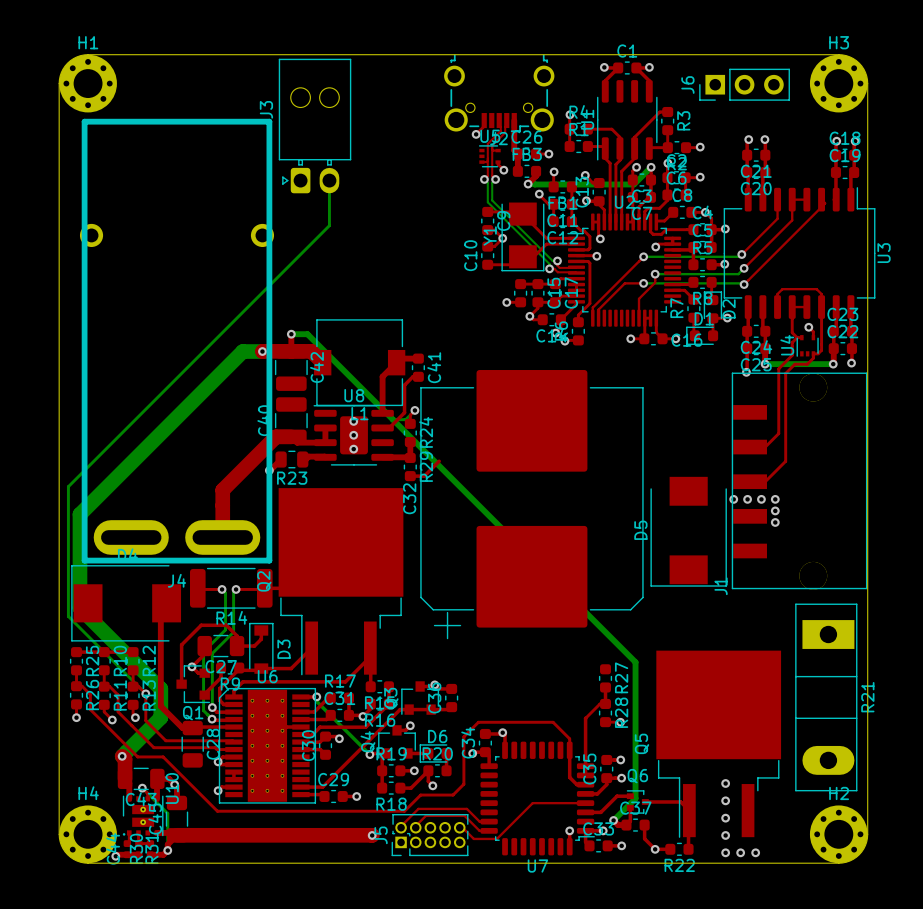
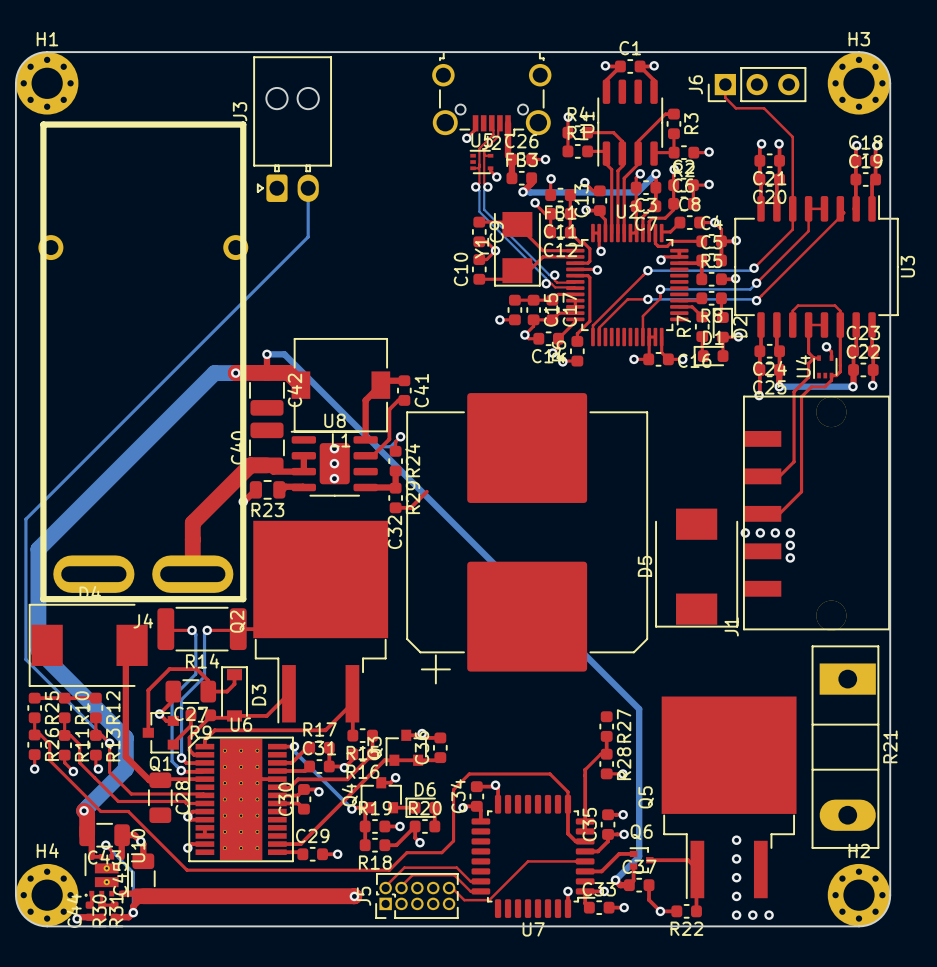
top track: none -> (725, 84) (725, 97) (735, 108) (764, 108) (792, 136) (792, 208)
top track: none -> (91, 856) (101, 856)

